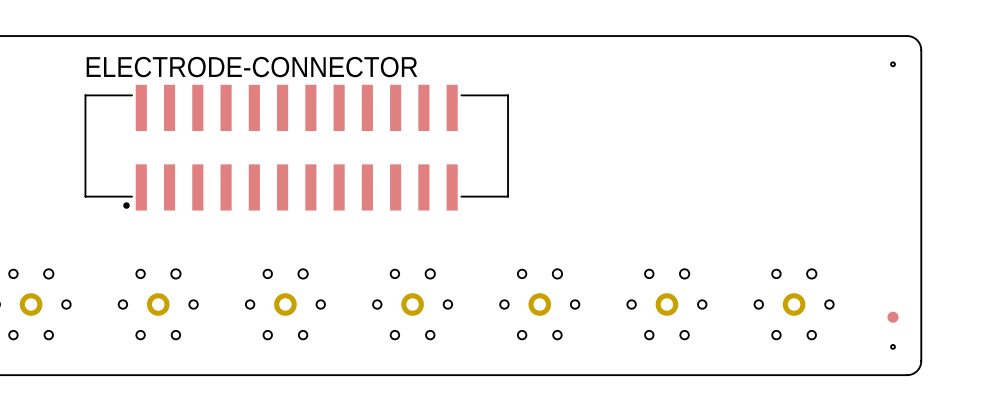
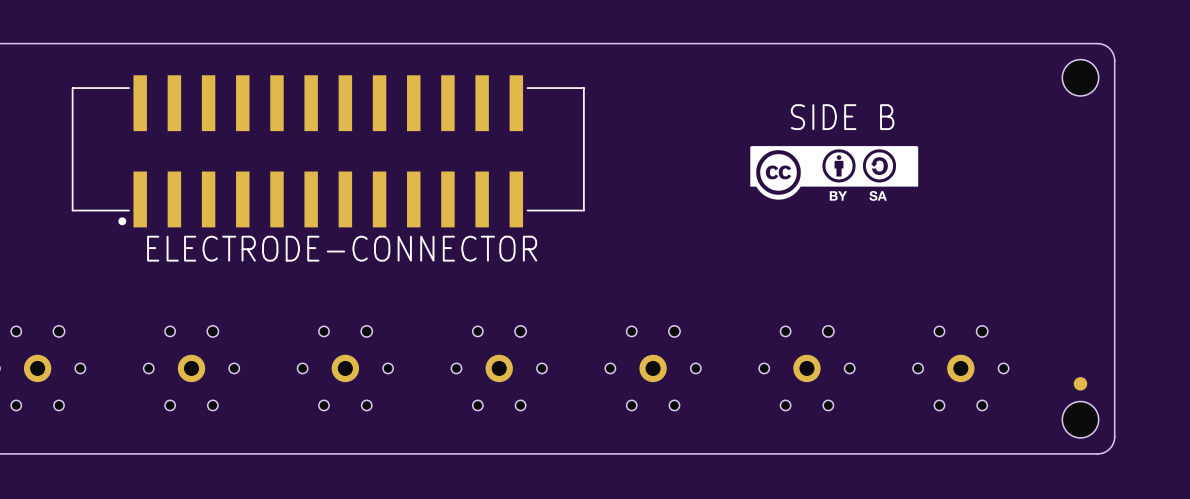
hole size: [891, 62, 895, 67] -> [1062, 59, 1099, 96]
ELECTRODE-CONNECTOR name position: ELECTRODE-CONNECTOR (251, 67) -> ELECTRODE-CONNECTOR (342, 248)
text: none -> SIDE B (842, 117)
drawing: none -> [750, 146, 919, 201]
ELECTRODE-CONNECTOR position: (296, 147) -> (328, 151)
hole size: [891, 344, 895, 349] -> [1062, 401, 1099, 438]

